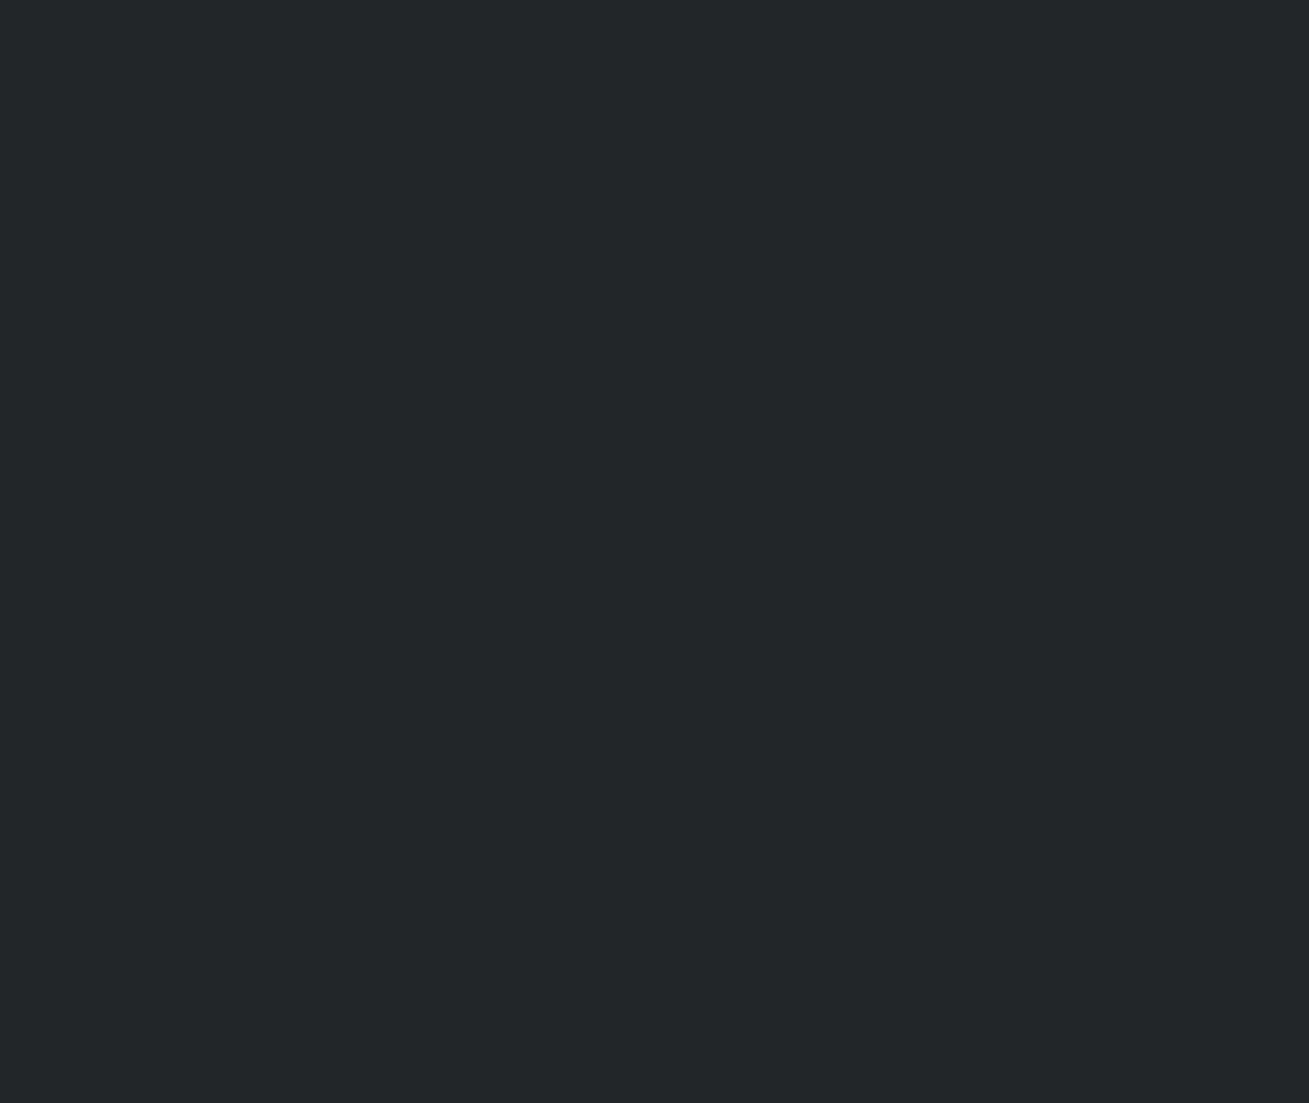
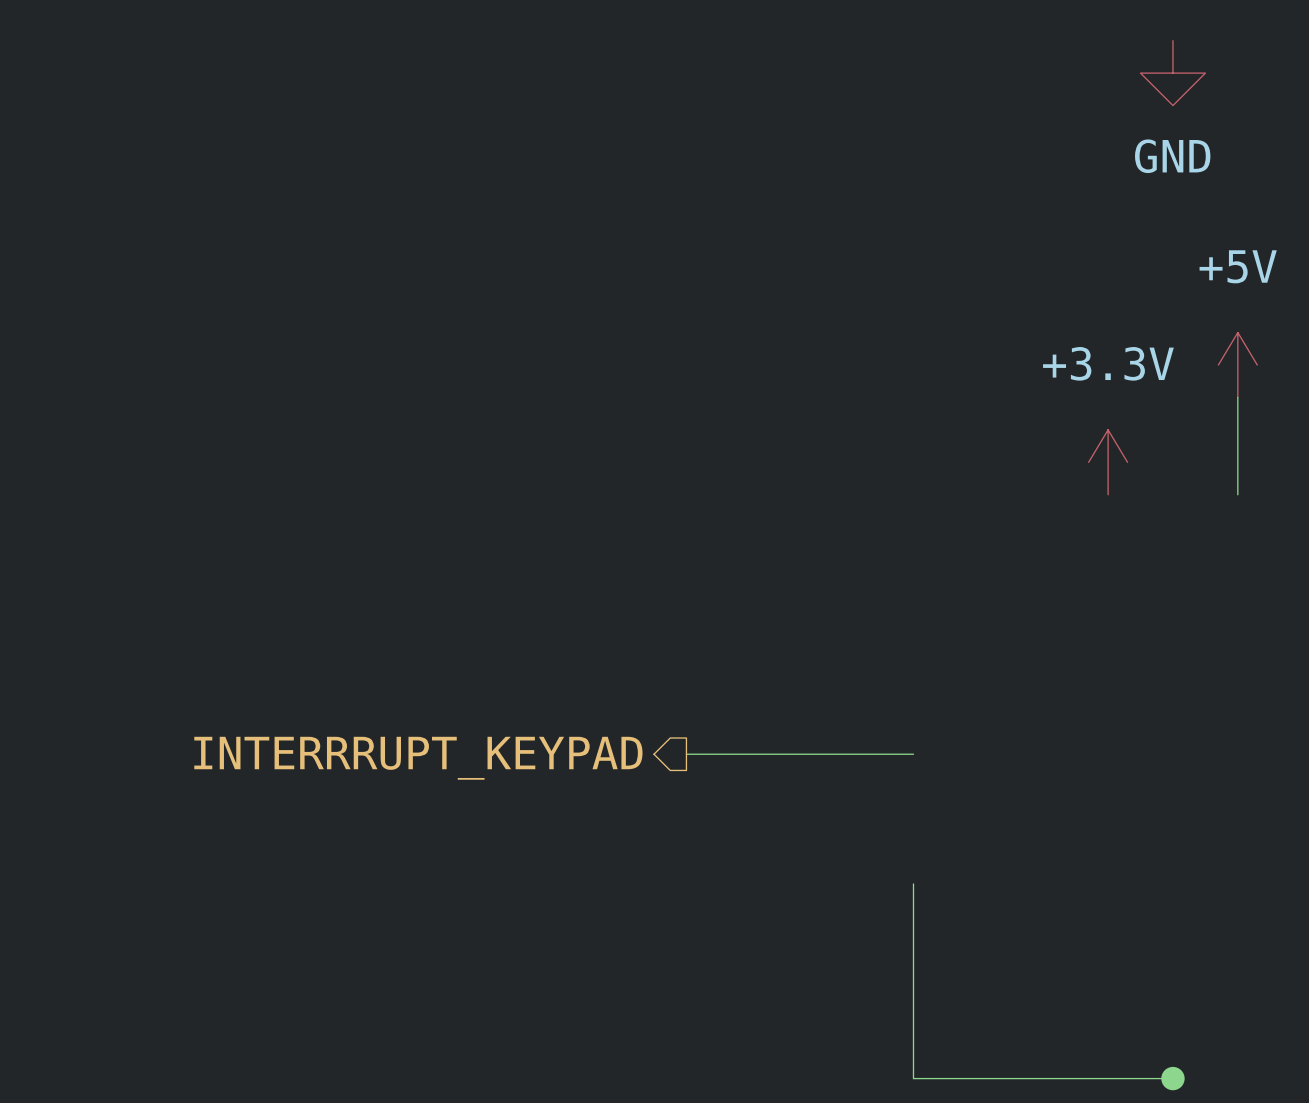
power symbol: none -> GND (1172, 73)
power symbol: none -> +5V (1237, 365)
wire: none -> (1237, 397) (1237, 494)
power symbol: none -> +3.3V (1108, 462)
wire: none -> (686, 754) (913, 754)
hierarchical label: none -> INTERRRUPT_KEYPAD (418, 758)
wire: none -> (913, 883) (913, 1078) (1172, 1078)
junction: none -> (1172, 1078)

